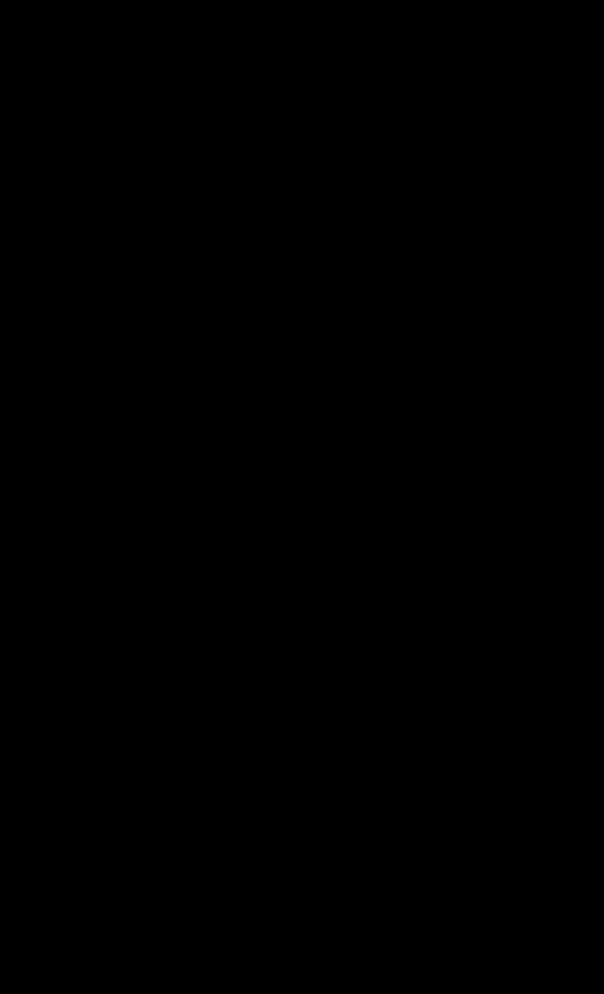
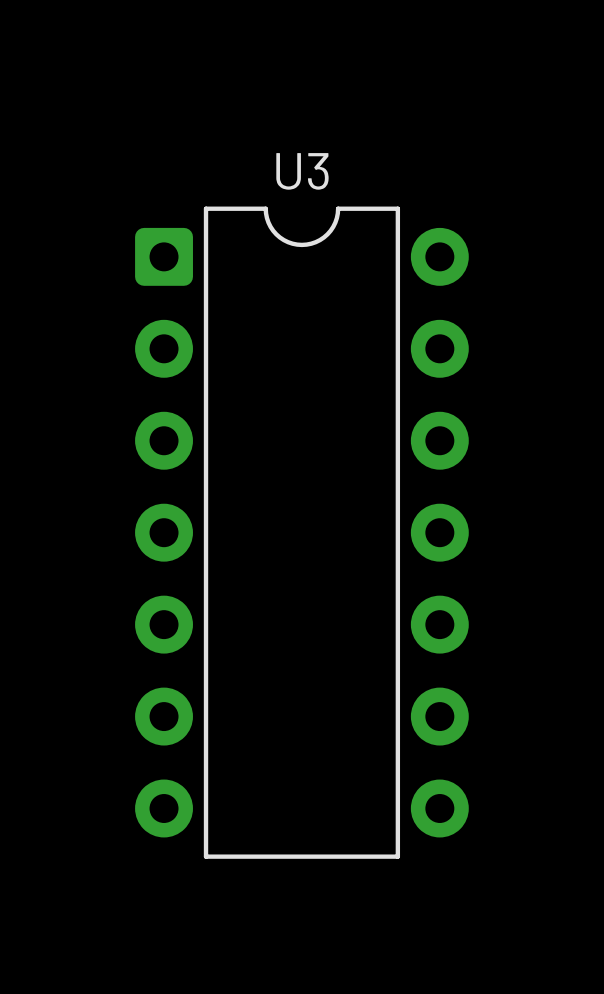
U3: none -> (301, 532)

